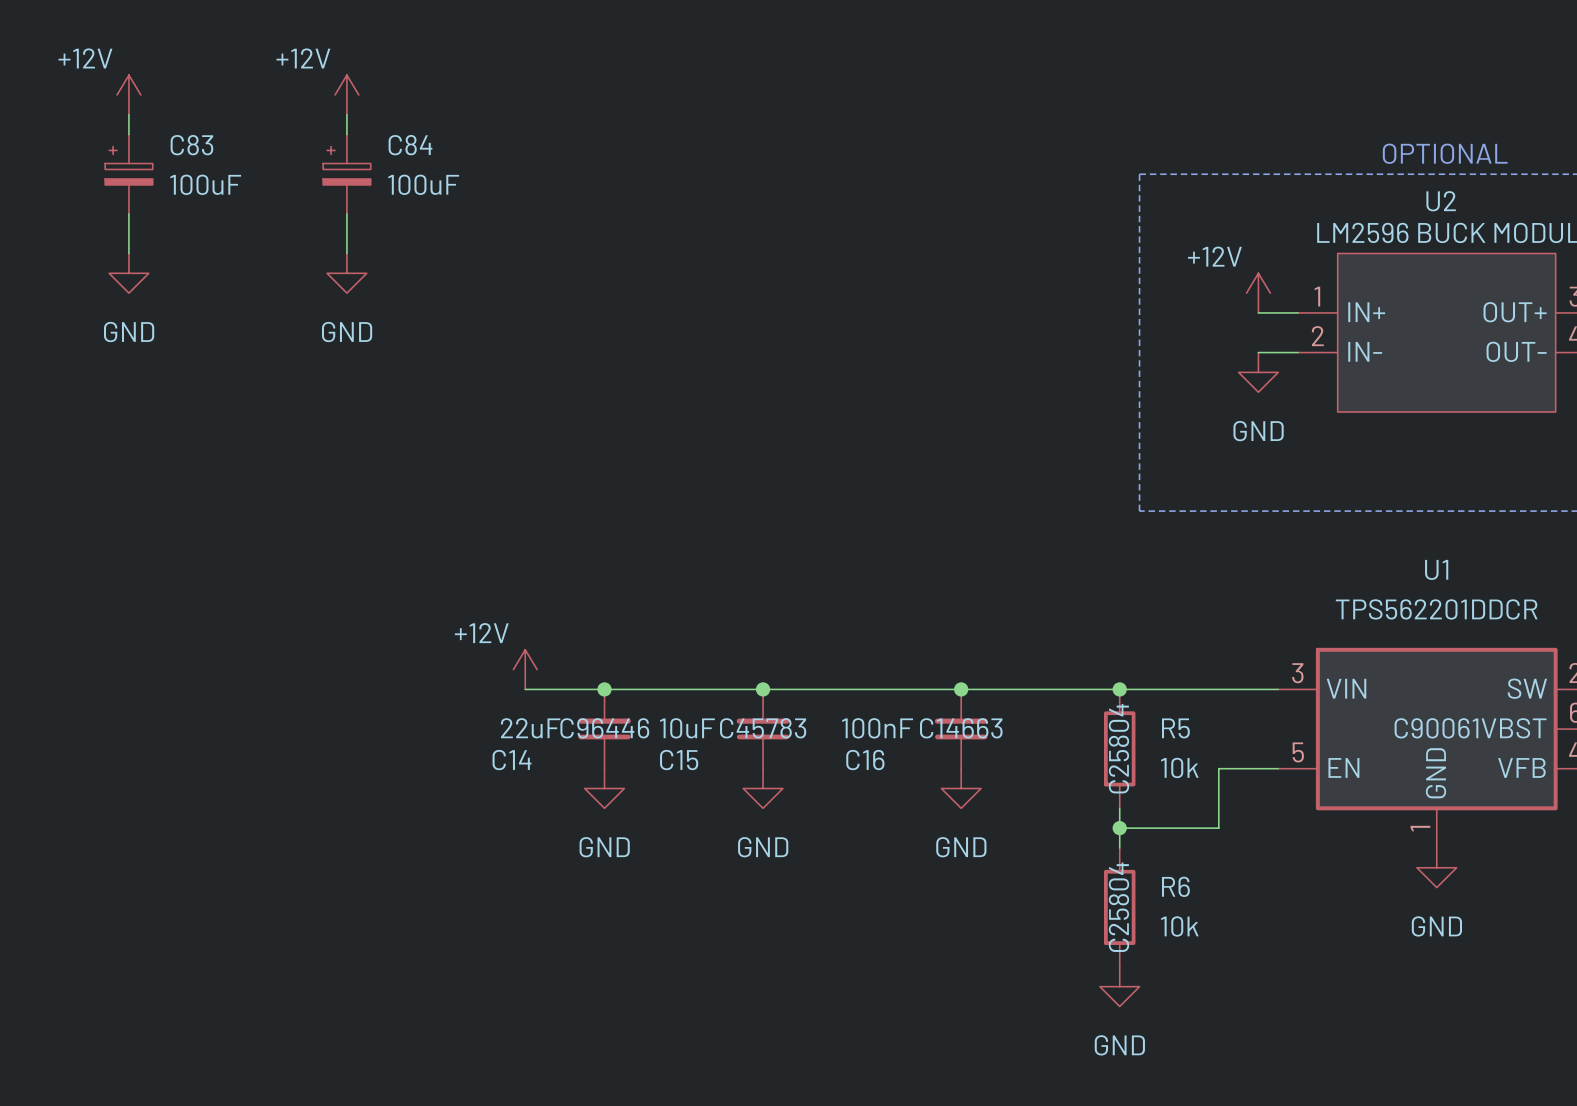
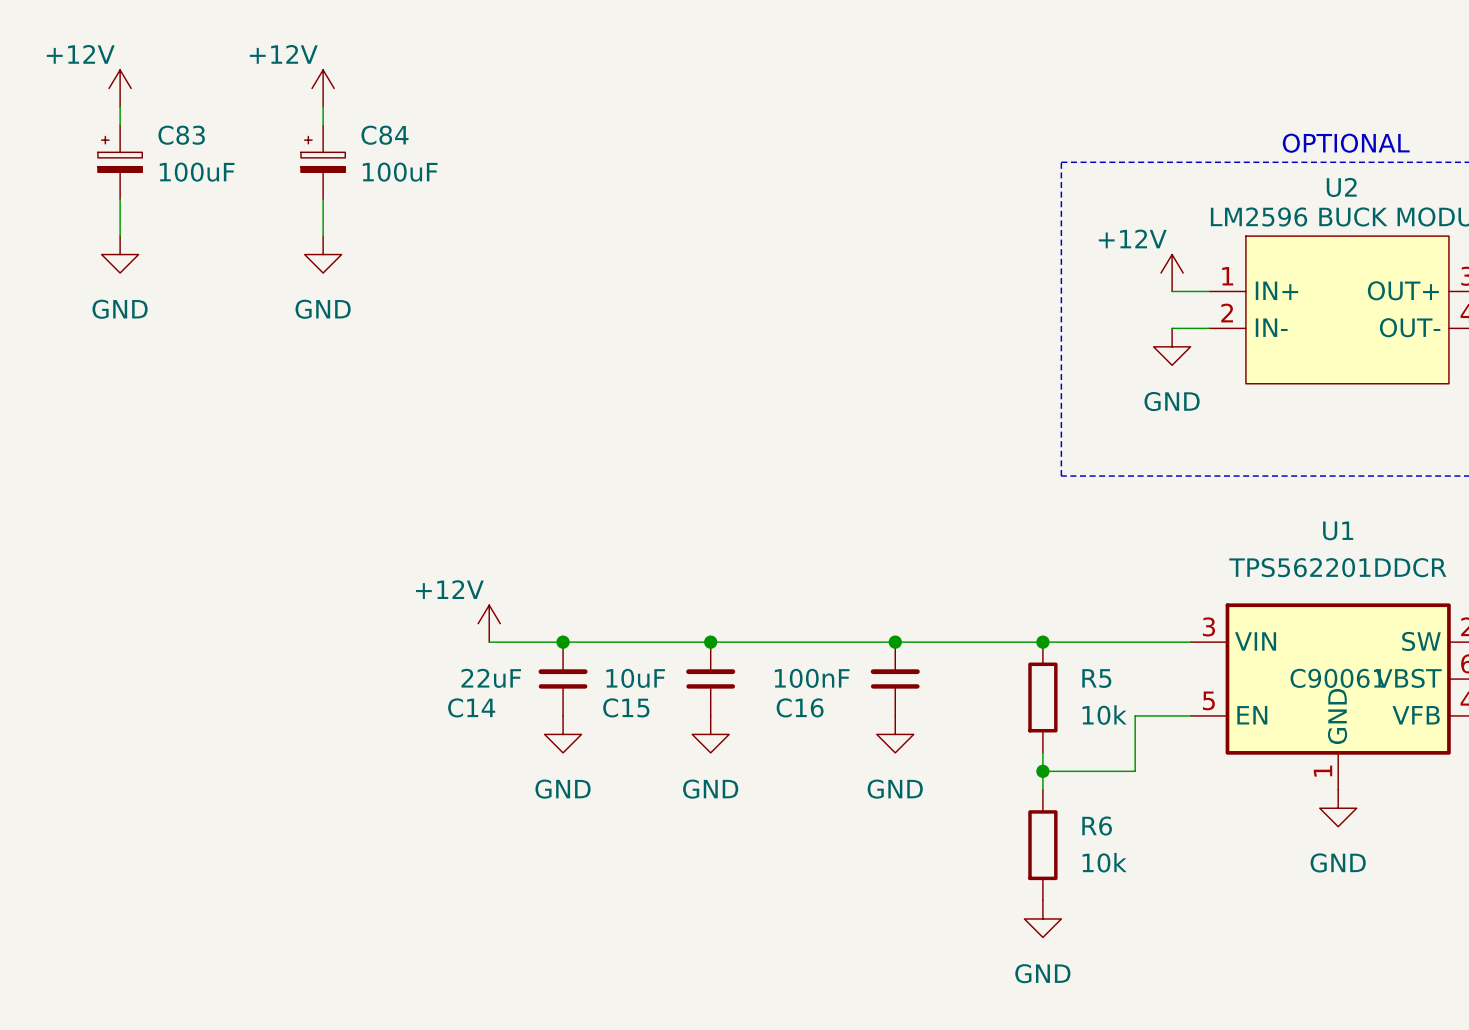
C14 text: C96446 (604, 728) -> none
C15 text: C45783 (763, 728) -> none
C16 text: C14663 (961, 728) -> none
R5 text: C25804 (1118, 748) -> none
R6 text: C25804 (1118, 907) -> none

